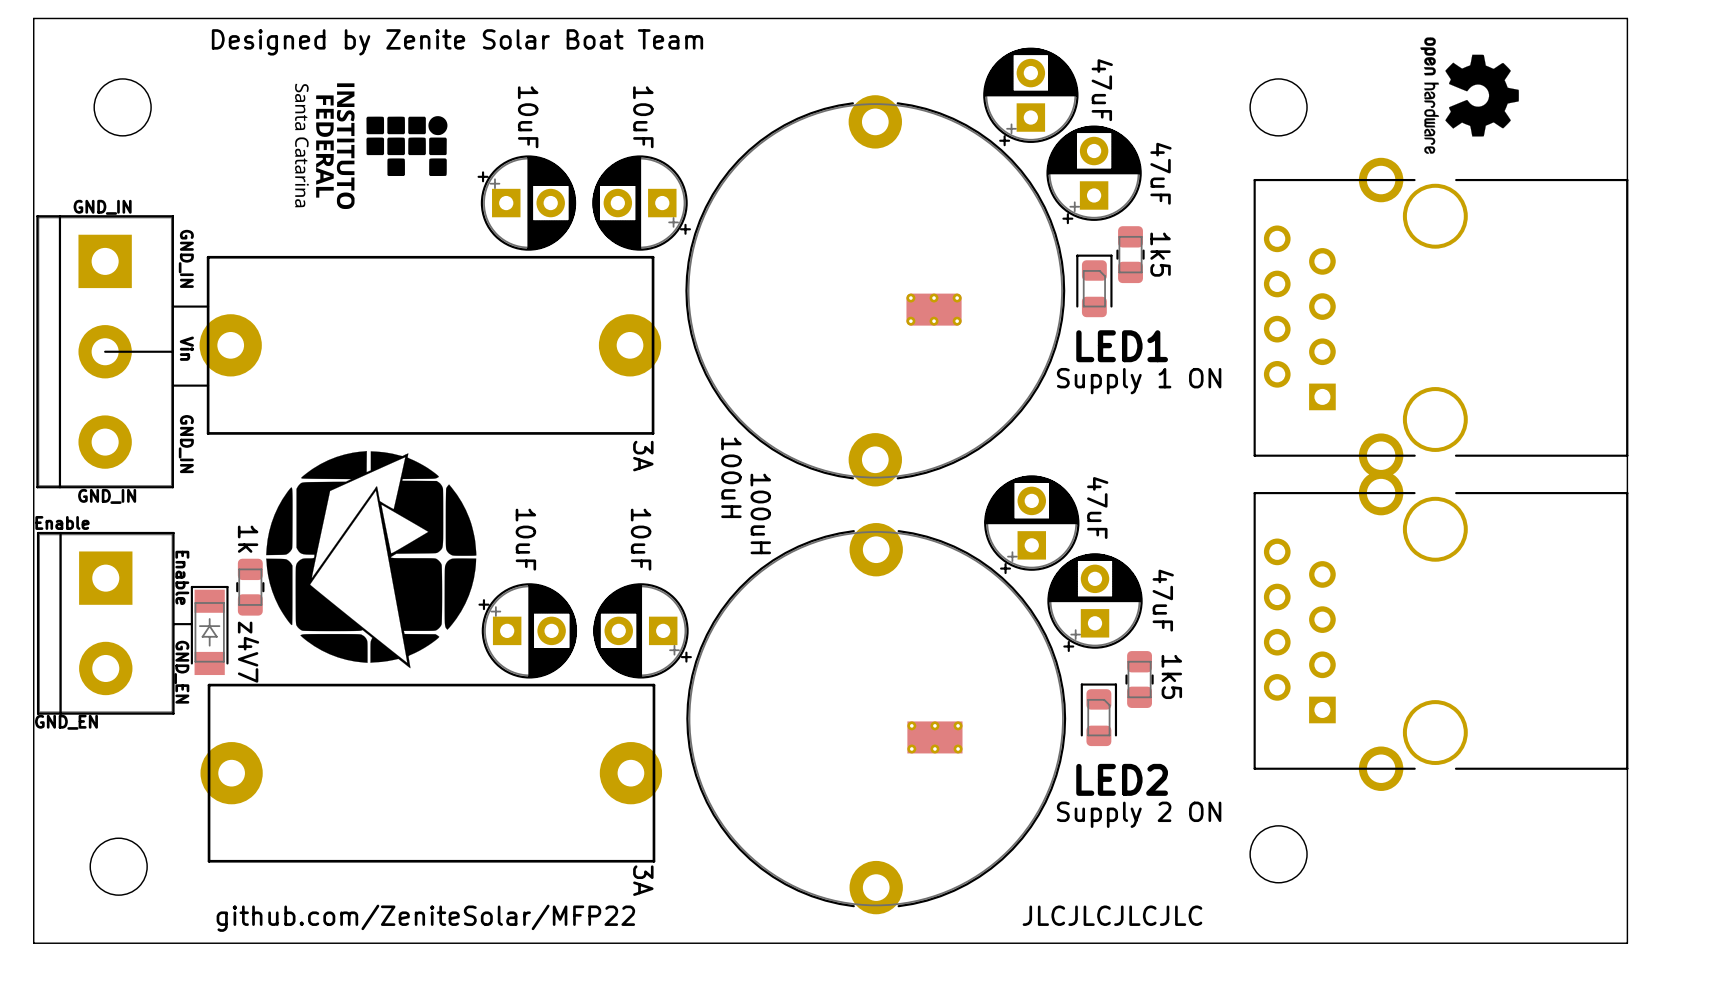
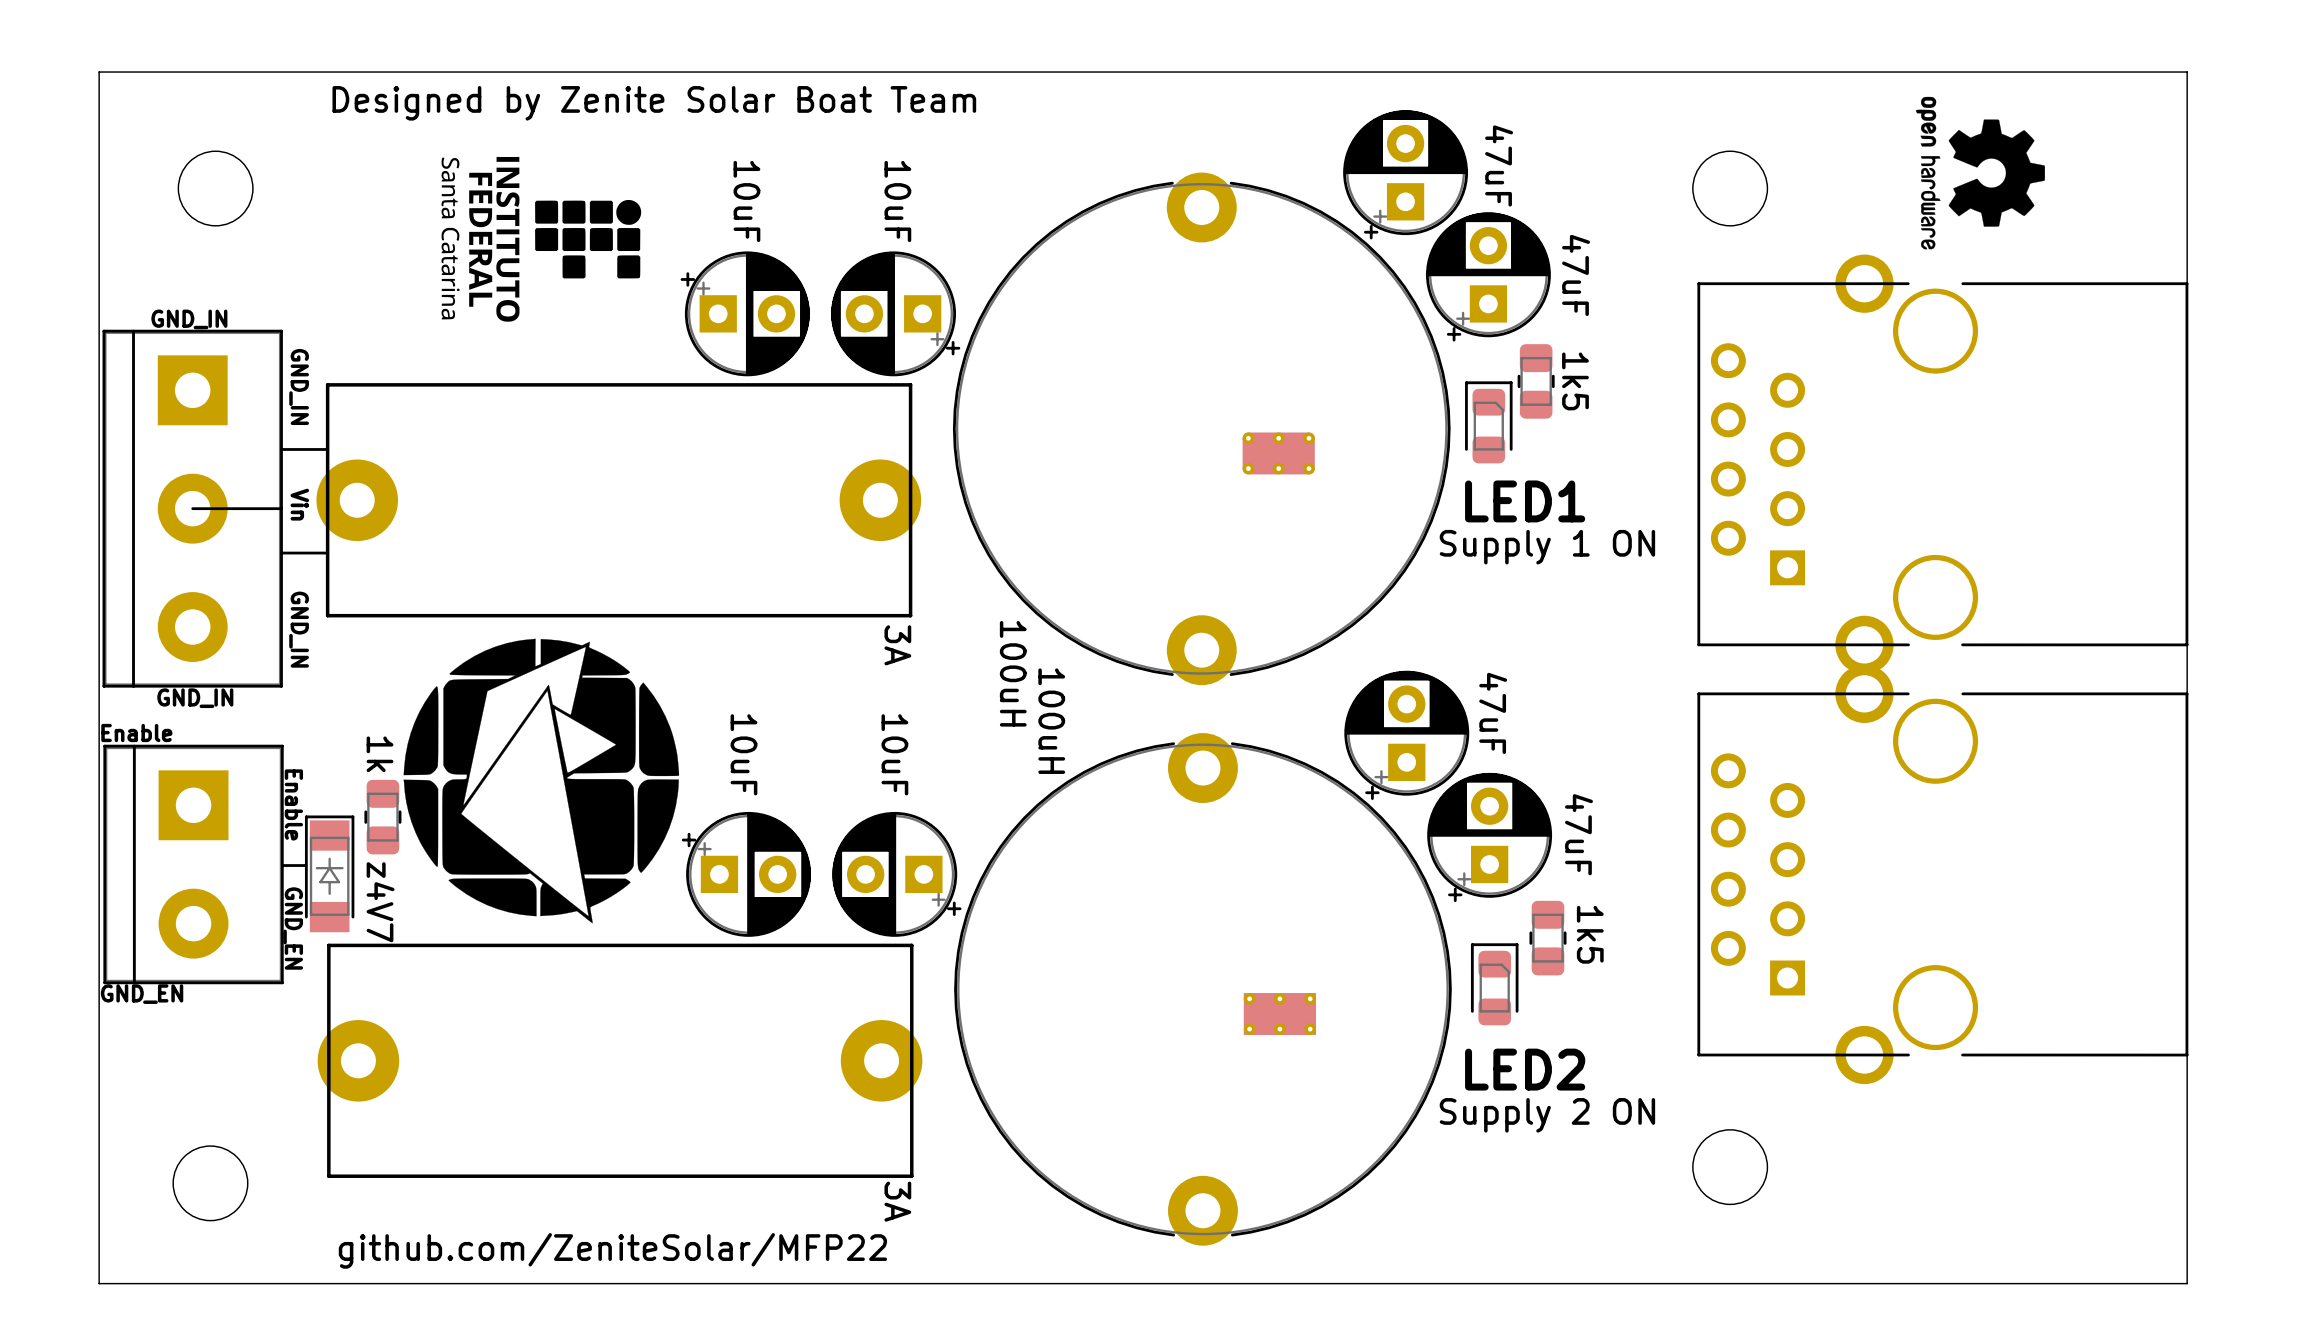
text: JLCJLCJLCJLC (1112, 915) -> none

